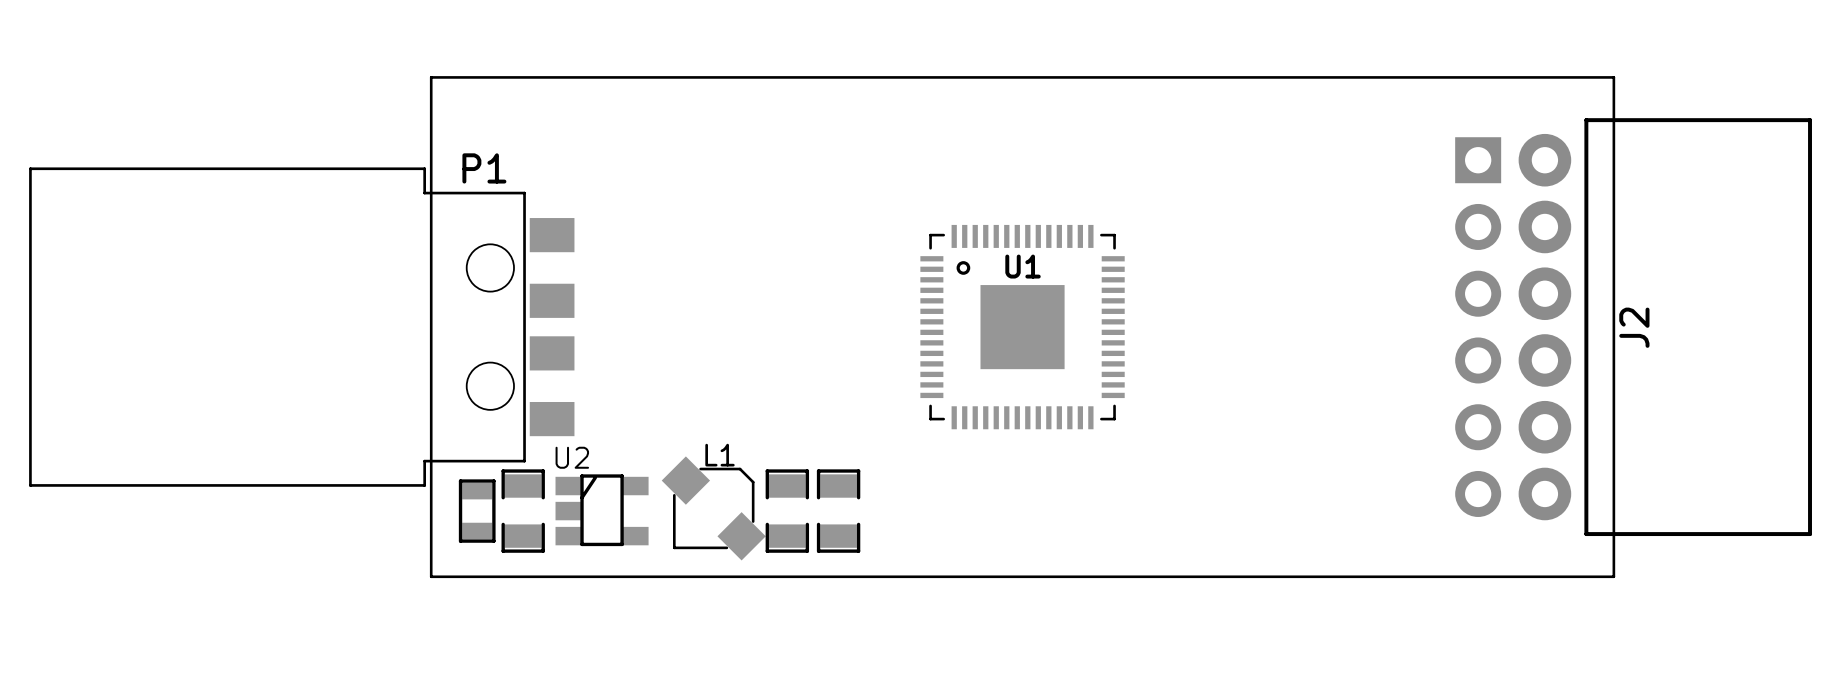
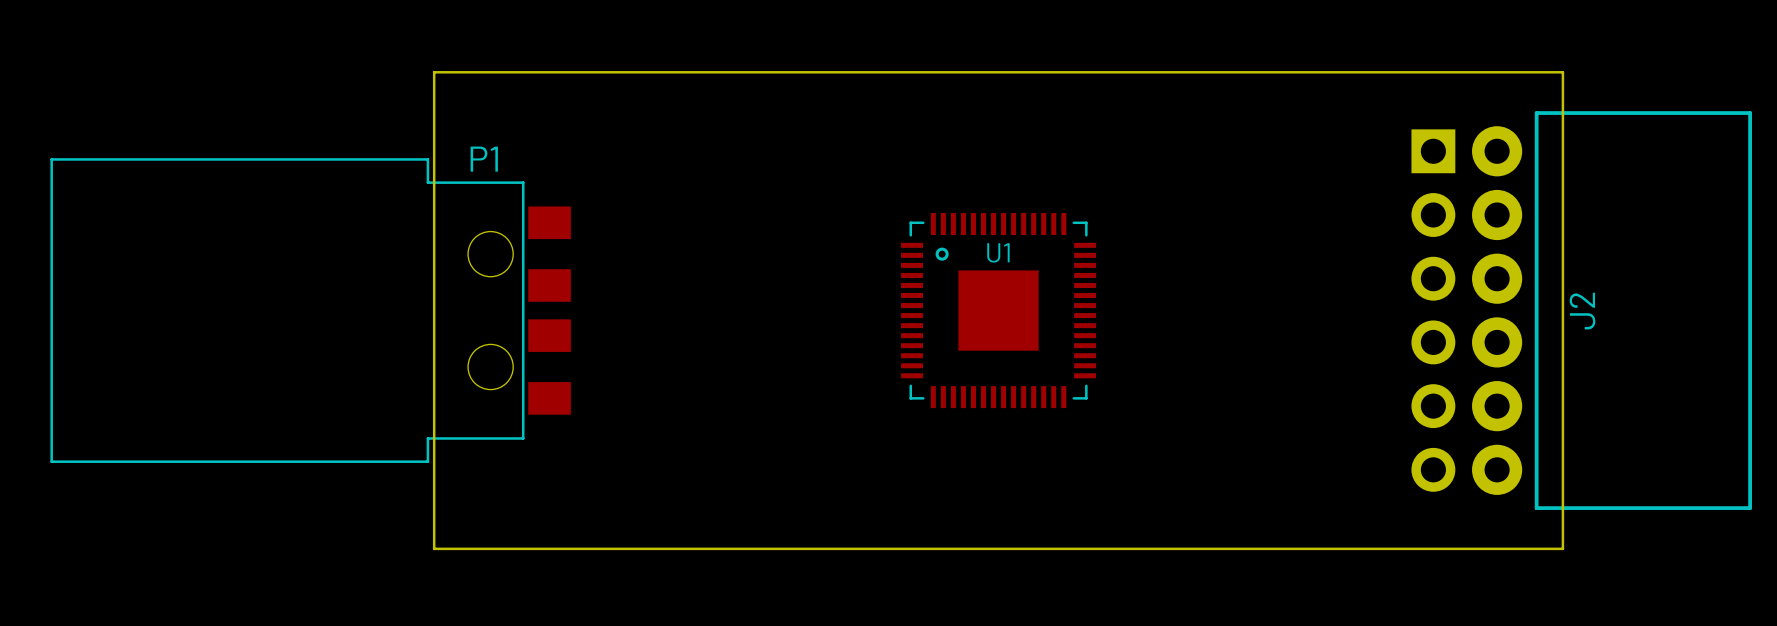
L1: (713, 508) -> none
U2: (602, 510) -> none
part: (477, 511) -> none
part: (523, 511) -> none
part: (787, 511) -> none
part: (838, 511) -> none

